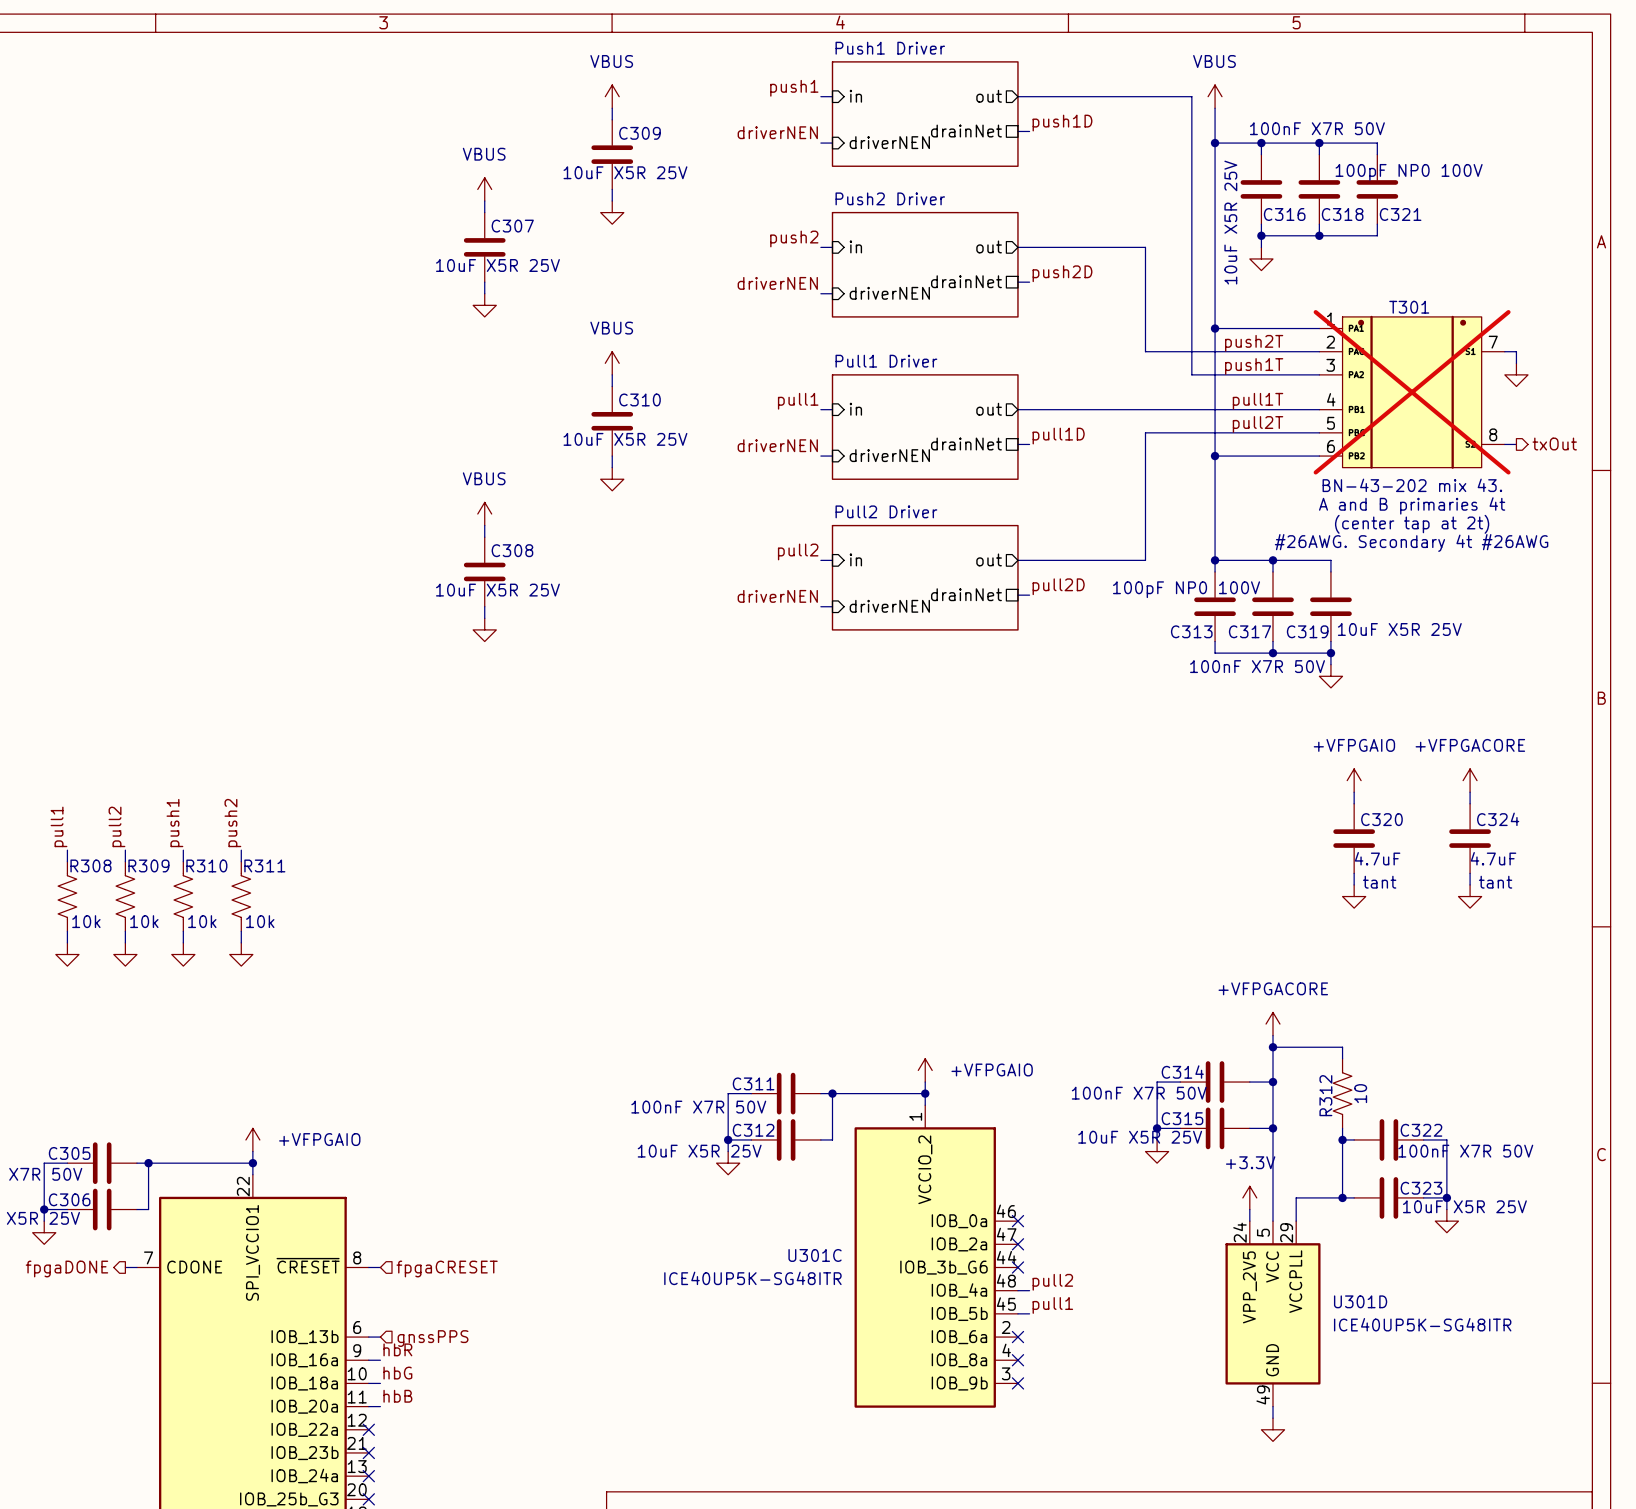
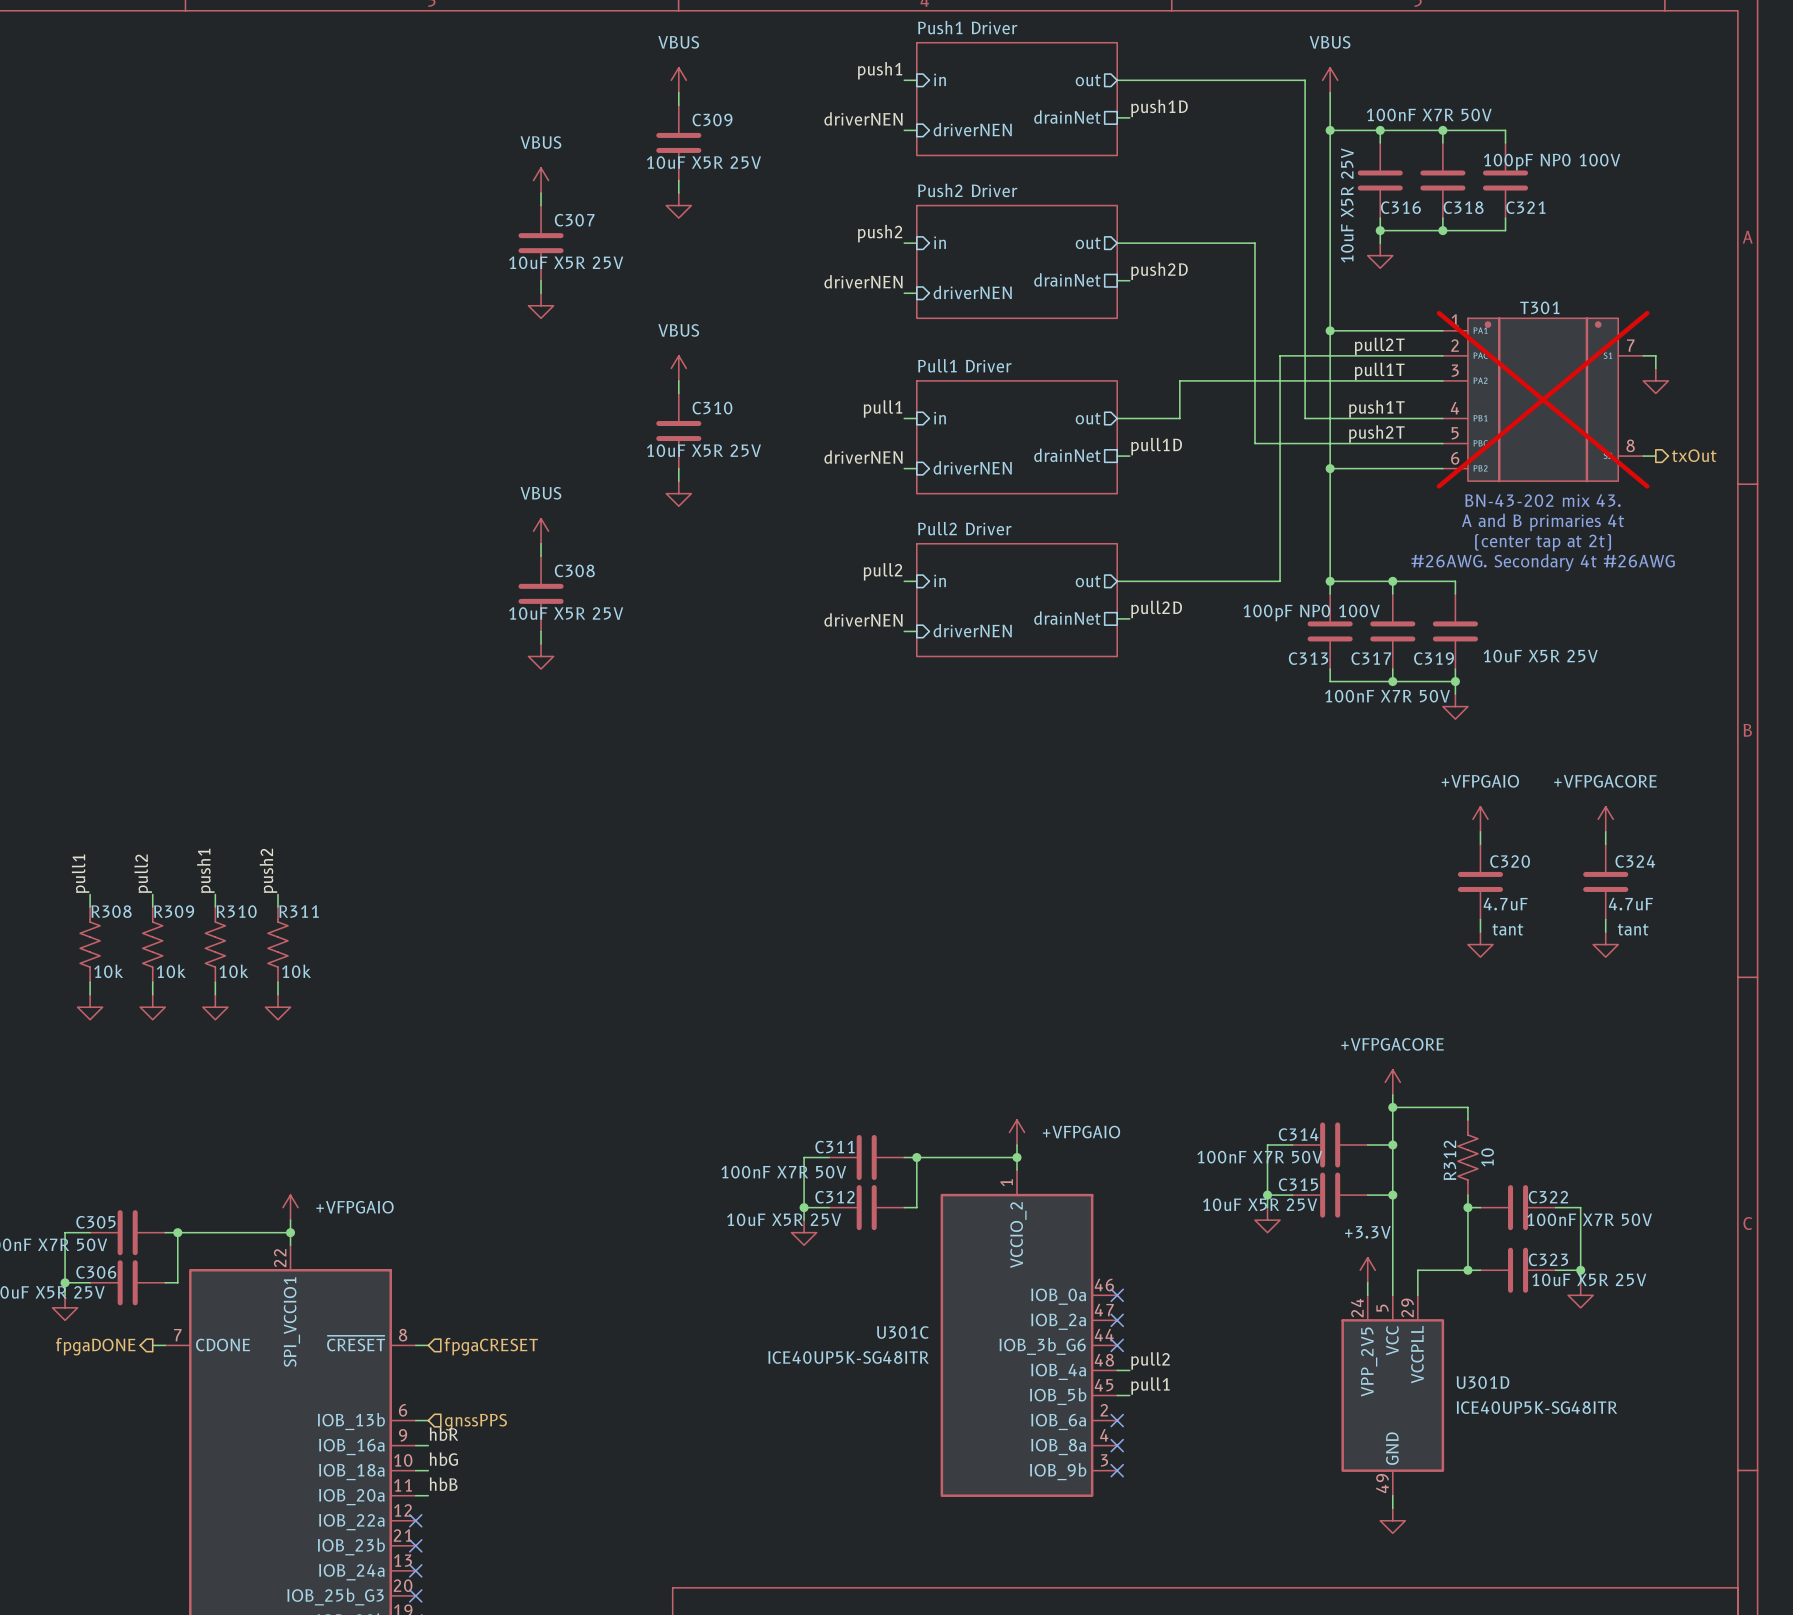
label: push2T (1254, 343) -> pull2T (1379, 346)
wire: (1145, 351) (1168, 351) -> (1255, 355) (1255, 443)
label: push1T (1254, 366) -> pull1T (1379, 371)
label: pull1T (1258, 401) -> push1T (1376, 408)
wire: (1075, 409) (1191, 409) -> (1179, 418) (1179, 380) (1305, 380) (1305, 418)
label: pull2T (1258, 424) -> push2T (1376, 434)
wire: (1145, 432) (1145, 560) -> (1280, 355) (1280, 581) (1255, 581)

